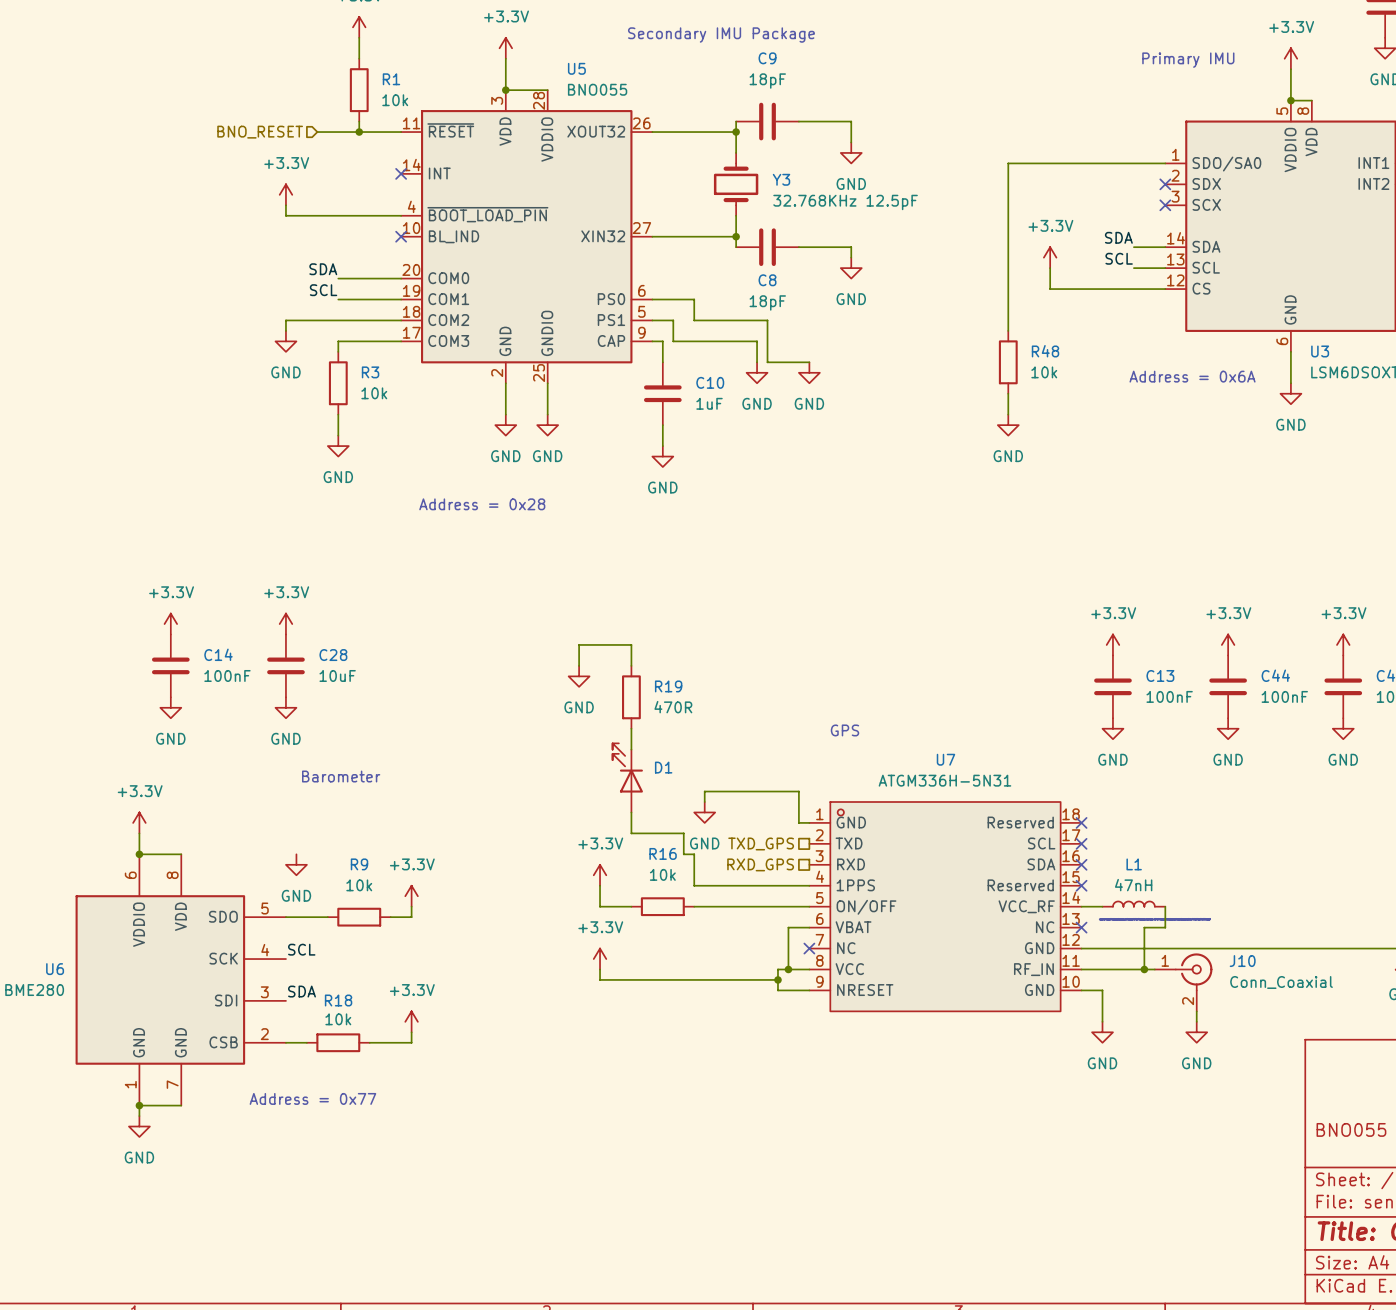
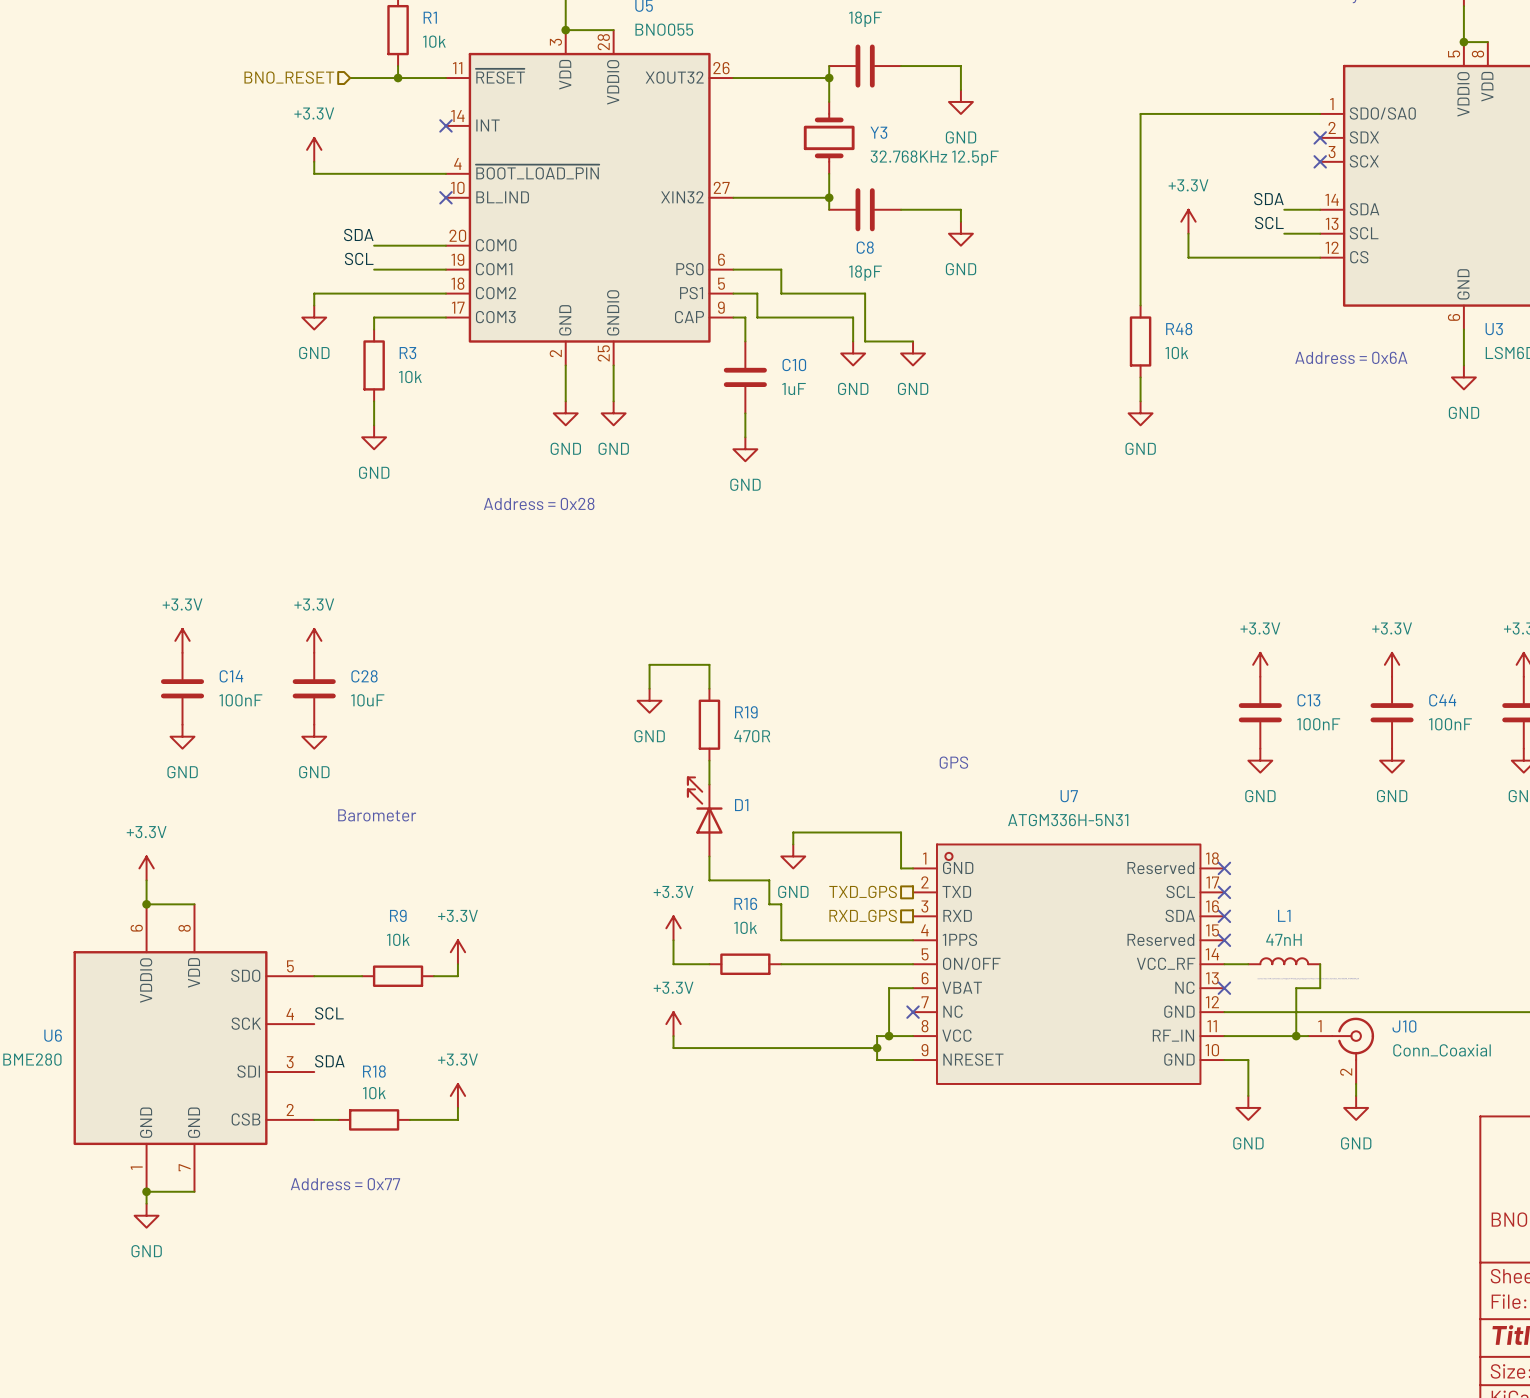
power symbol: GND (296, 864) -> none

